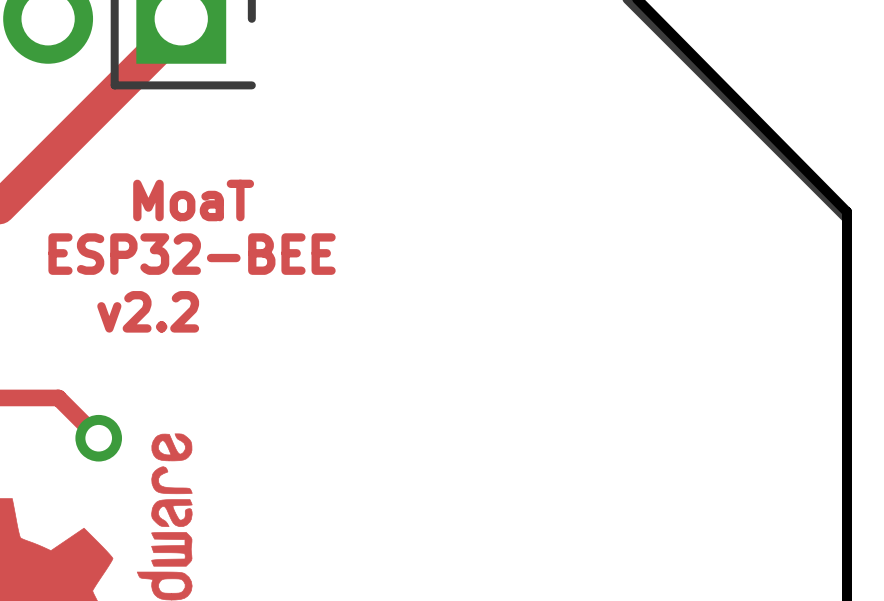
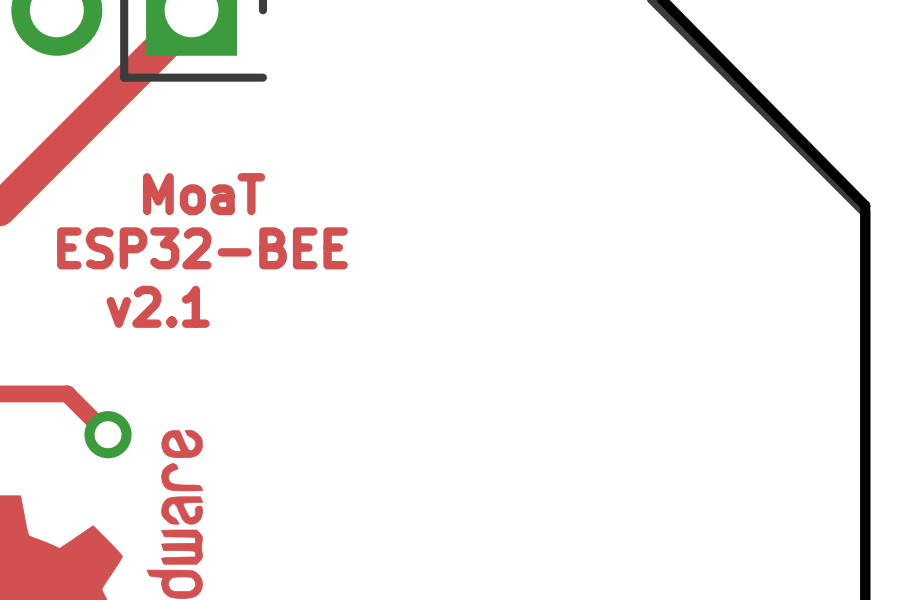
text: v2.2 (148, 311) -> v2.1 (158, 306)

